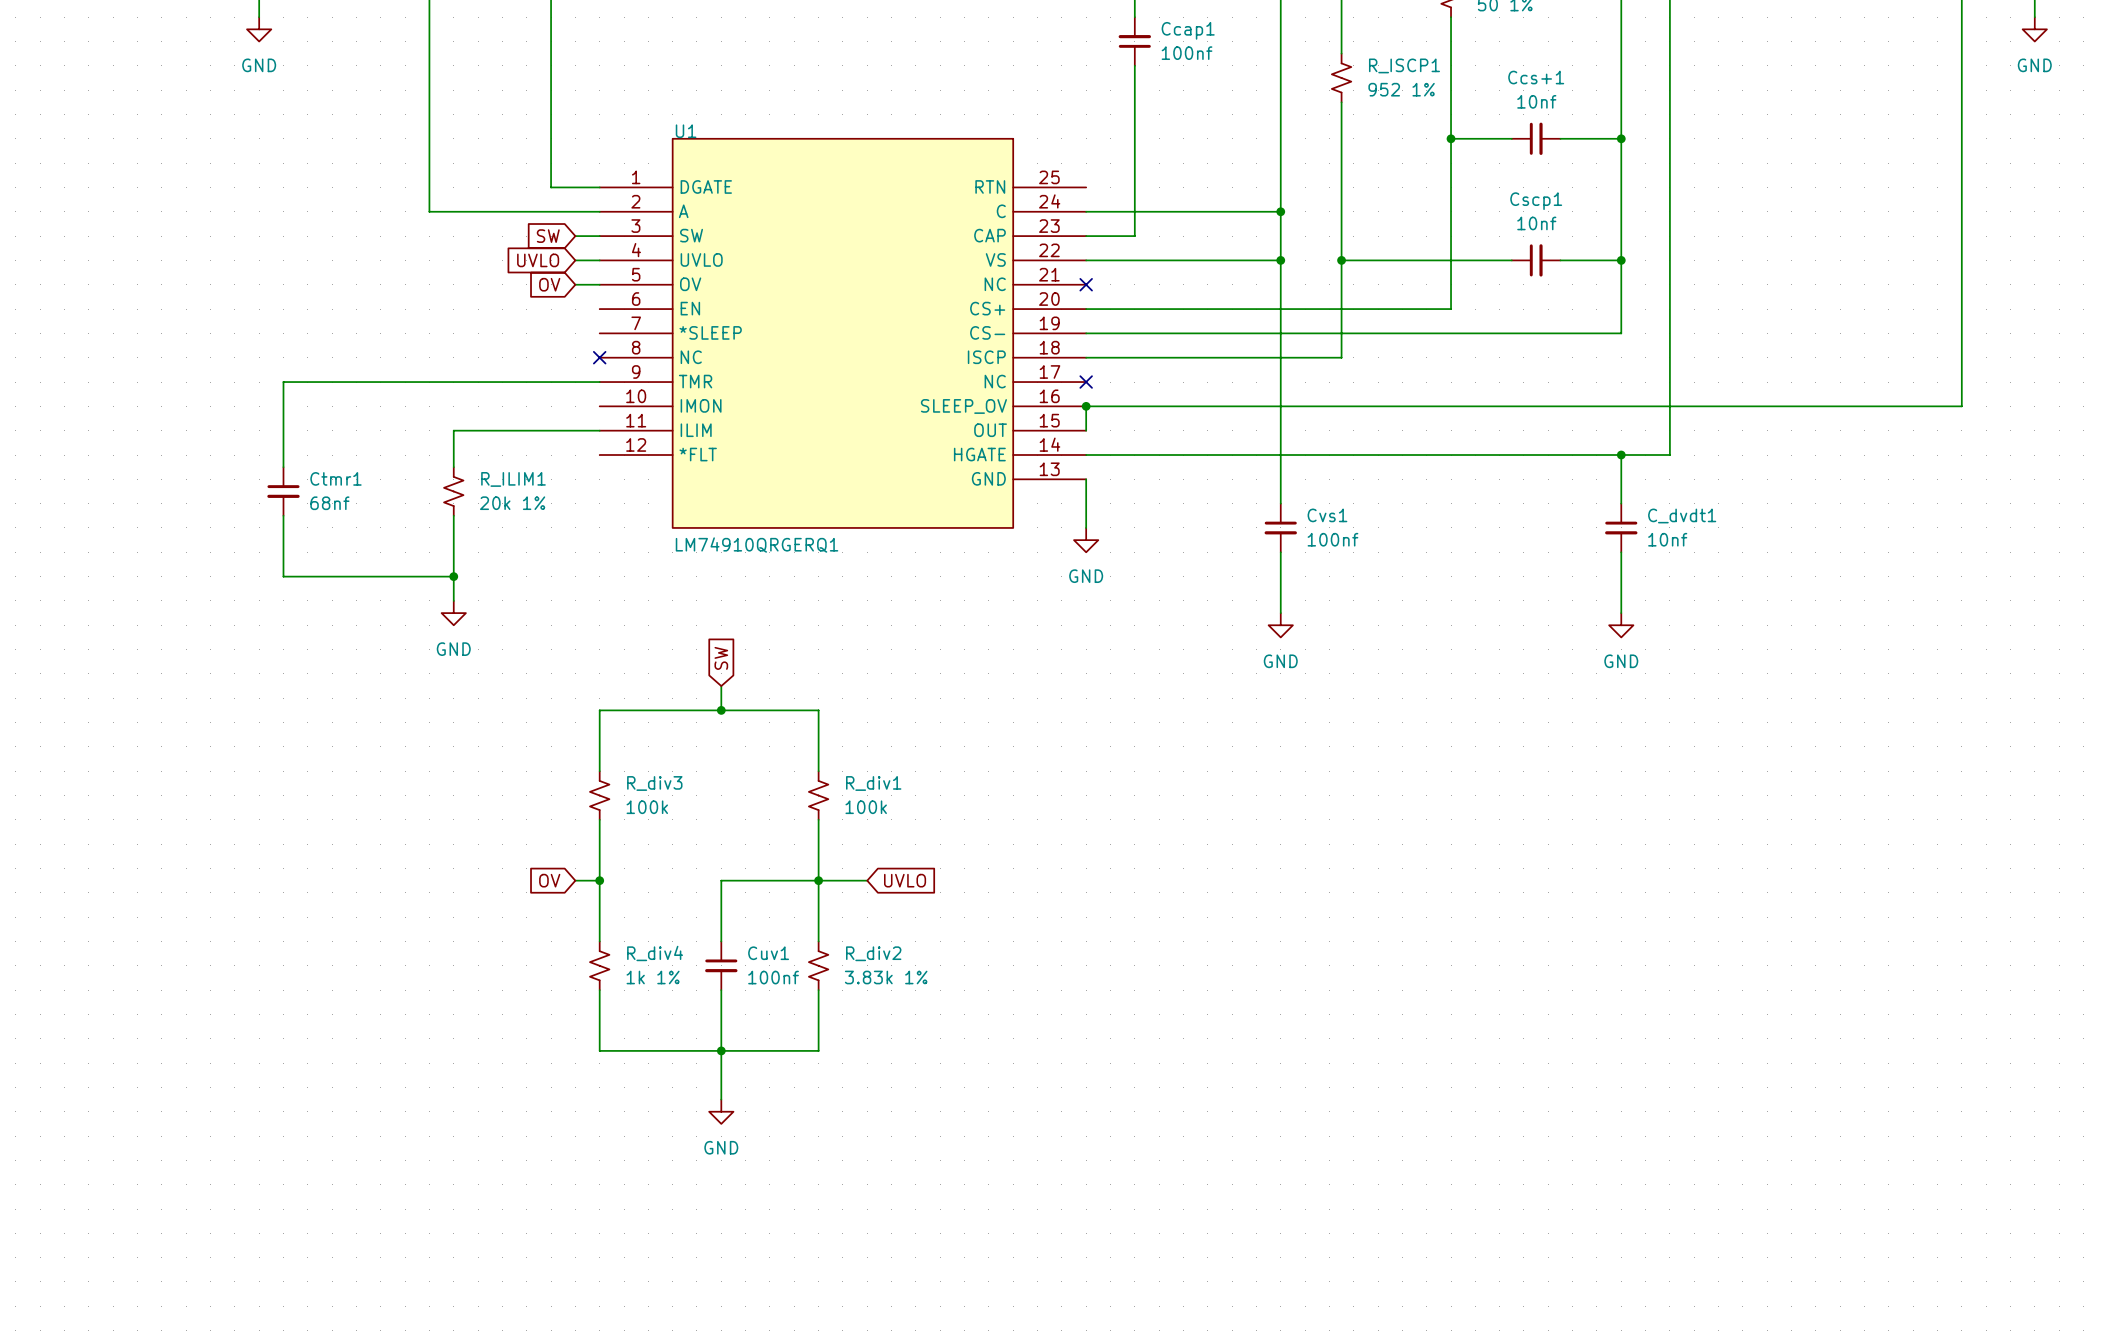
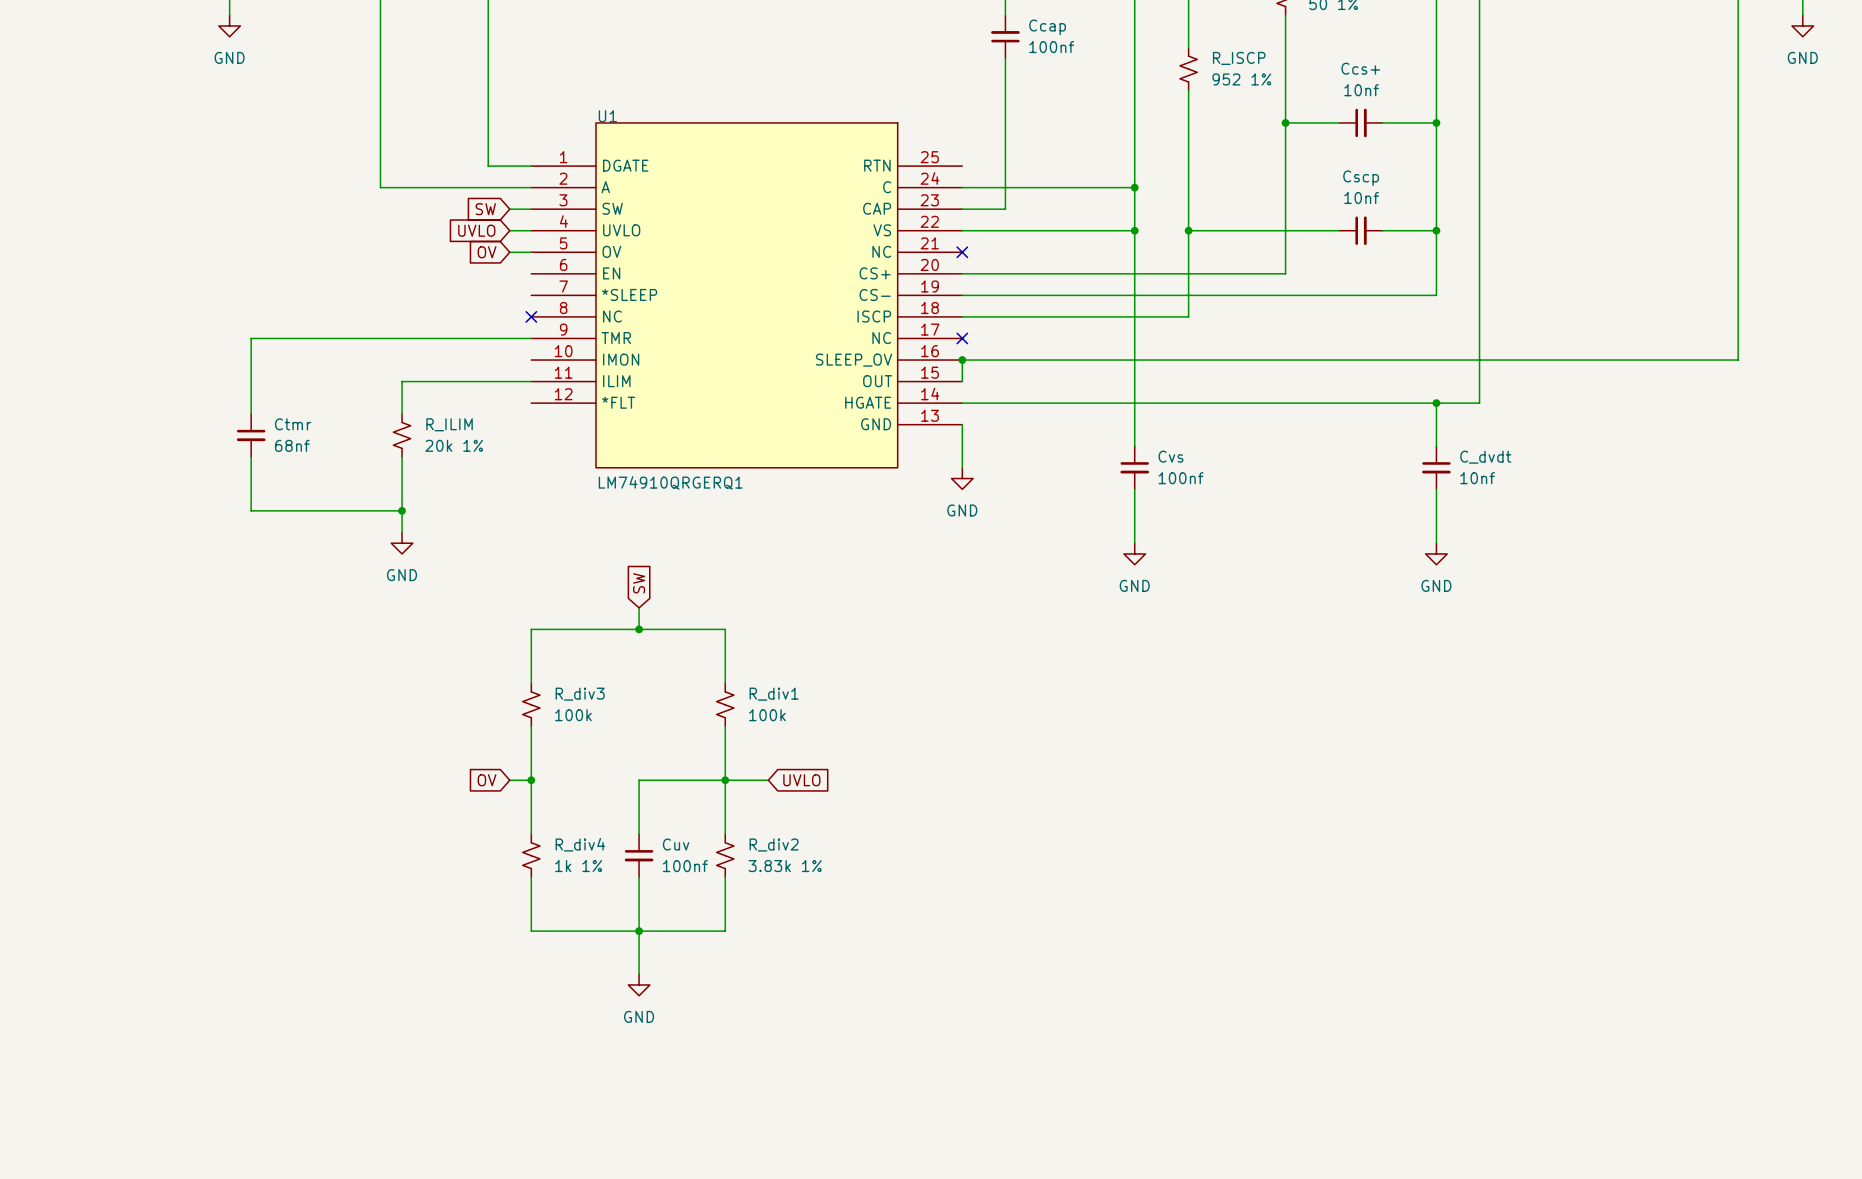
Ccap1 name: Ccap1 (1188, 30) -> Ccap (1047, 27)
R_ISCP1 name: R_ISCP1 (1404, 65) -> R_ISCP (1239, 58)
Ccs+1 name: Ccs+1 (1536, 77) -> Ccs+ (1360, 68)
Cscp1 name: Cscp1 (1536, 201) -> Cscp (1361, 178)
Ctmr1 name: Ctmr1 (335, 478) -> Ctmr (293, 424)
R_ILIM1 name: R_ILIM1 (513, 479) -> R_ILIM (449, 424)
Cvs1 name: Cvs1 (1327, 515) -> Cvs (1170, 456)
C_dvdt1 name: C_dvdt1 (1682, 515) -> C_dvdt (1485, 457)
Cuv1 name: Cuv1 (768, 953) -> Cuv (676, 844)

